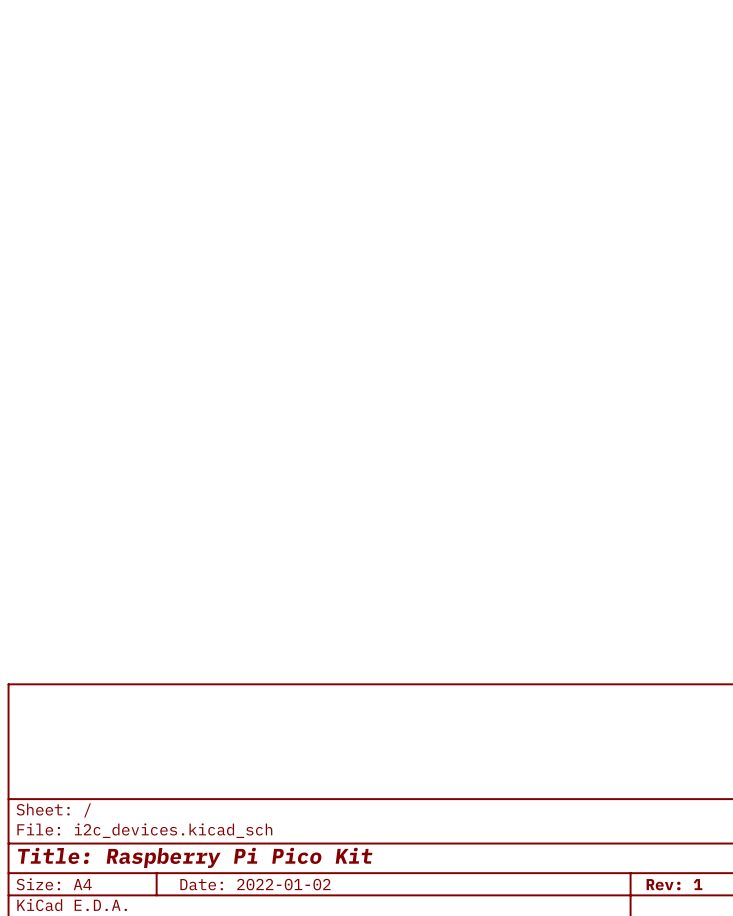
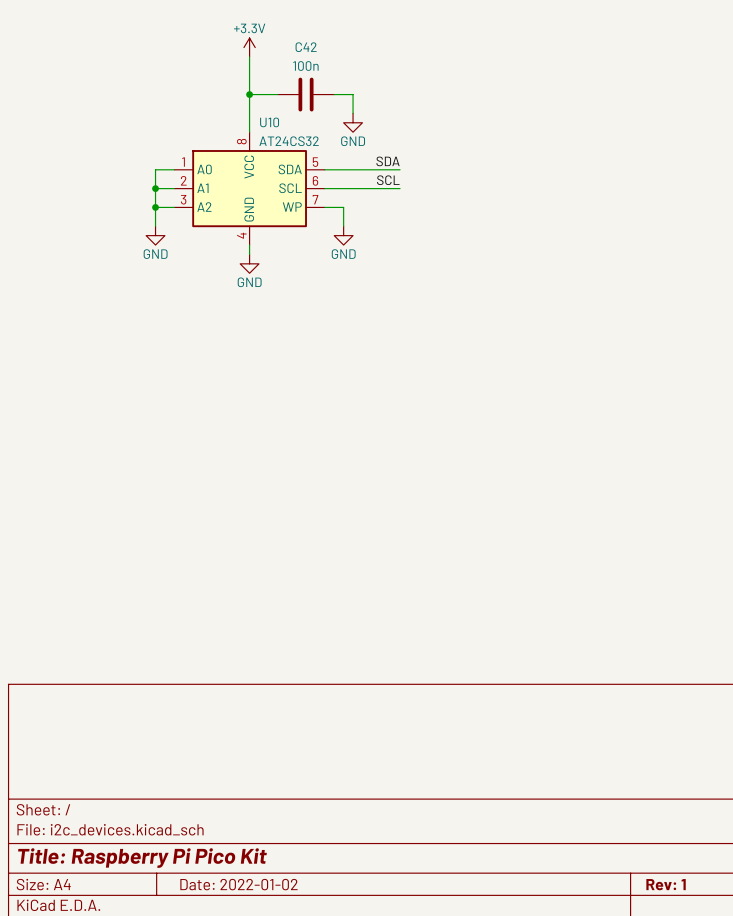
power symbol: none -> +3.3V (249, 47)
wire: none -> (249, 56) (249, 132)
wire: none -> (249, 94) (277, 94)
junction: none -> (249, 94)
C42: none -> 100n (306, 94)
wire: none -> (334, 94) (353, 94) (353, 113)
power symbol: none -> GND (353, 122)
label: none -> SDA (388, 161)
wire: none -> (174, 169) (155, 169) (155, 226)
wire: none -> (324, 169) (400, 169)
label: none -> SCL (388, 180)
wire: none -> (155, 188) (174, 188)
junction: none -> (155, 188)
U10: none -> AT24CS32 (249, 188)
wire: none -> (324, 188) (400, 188)
wire: none -> (155, 207) (174, 207)
junction: none -> (155, 207)
wire: none -> (324, 207) (343, 207) (343, 226)
power symbol: none -> GND (155, 235)
power symbol: none -> GND (343, 235)
wire: none -> (249, 245) (249, 254)
power symbol: none -> GND (249, 263)

